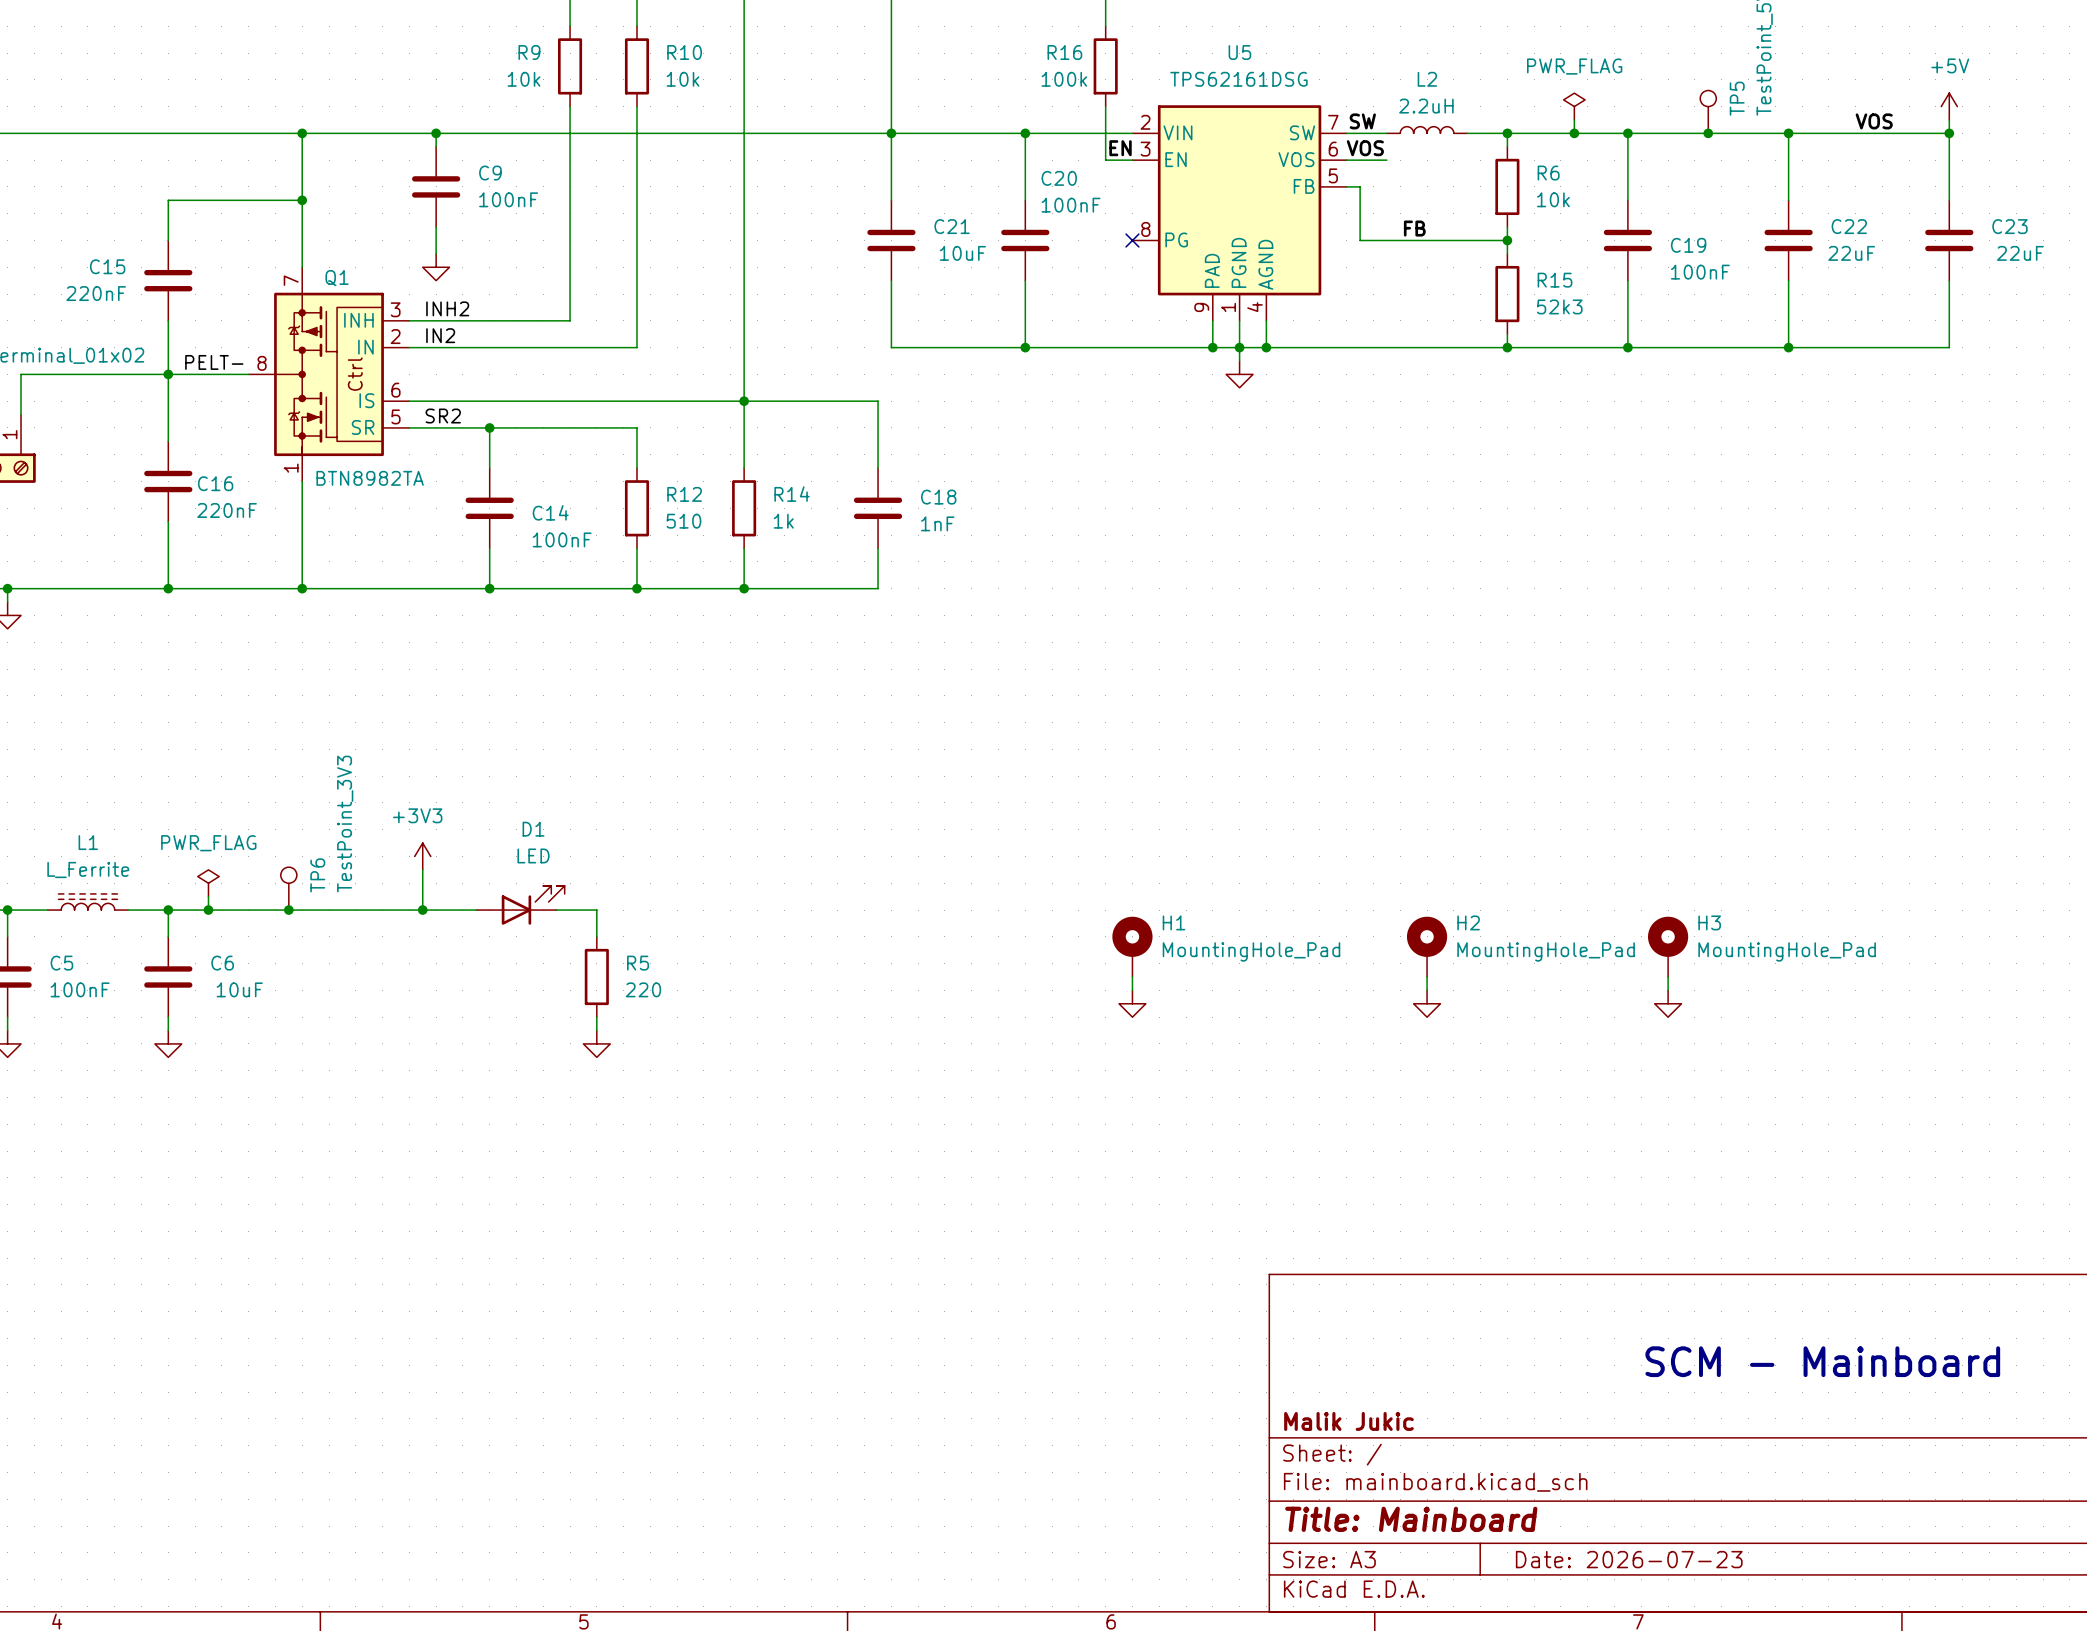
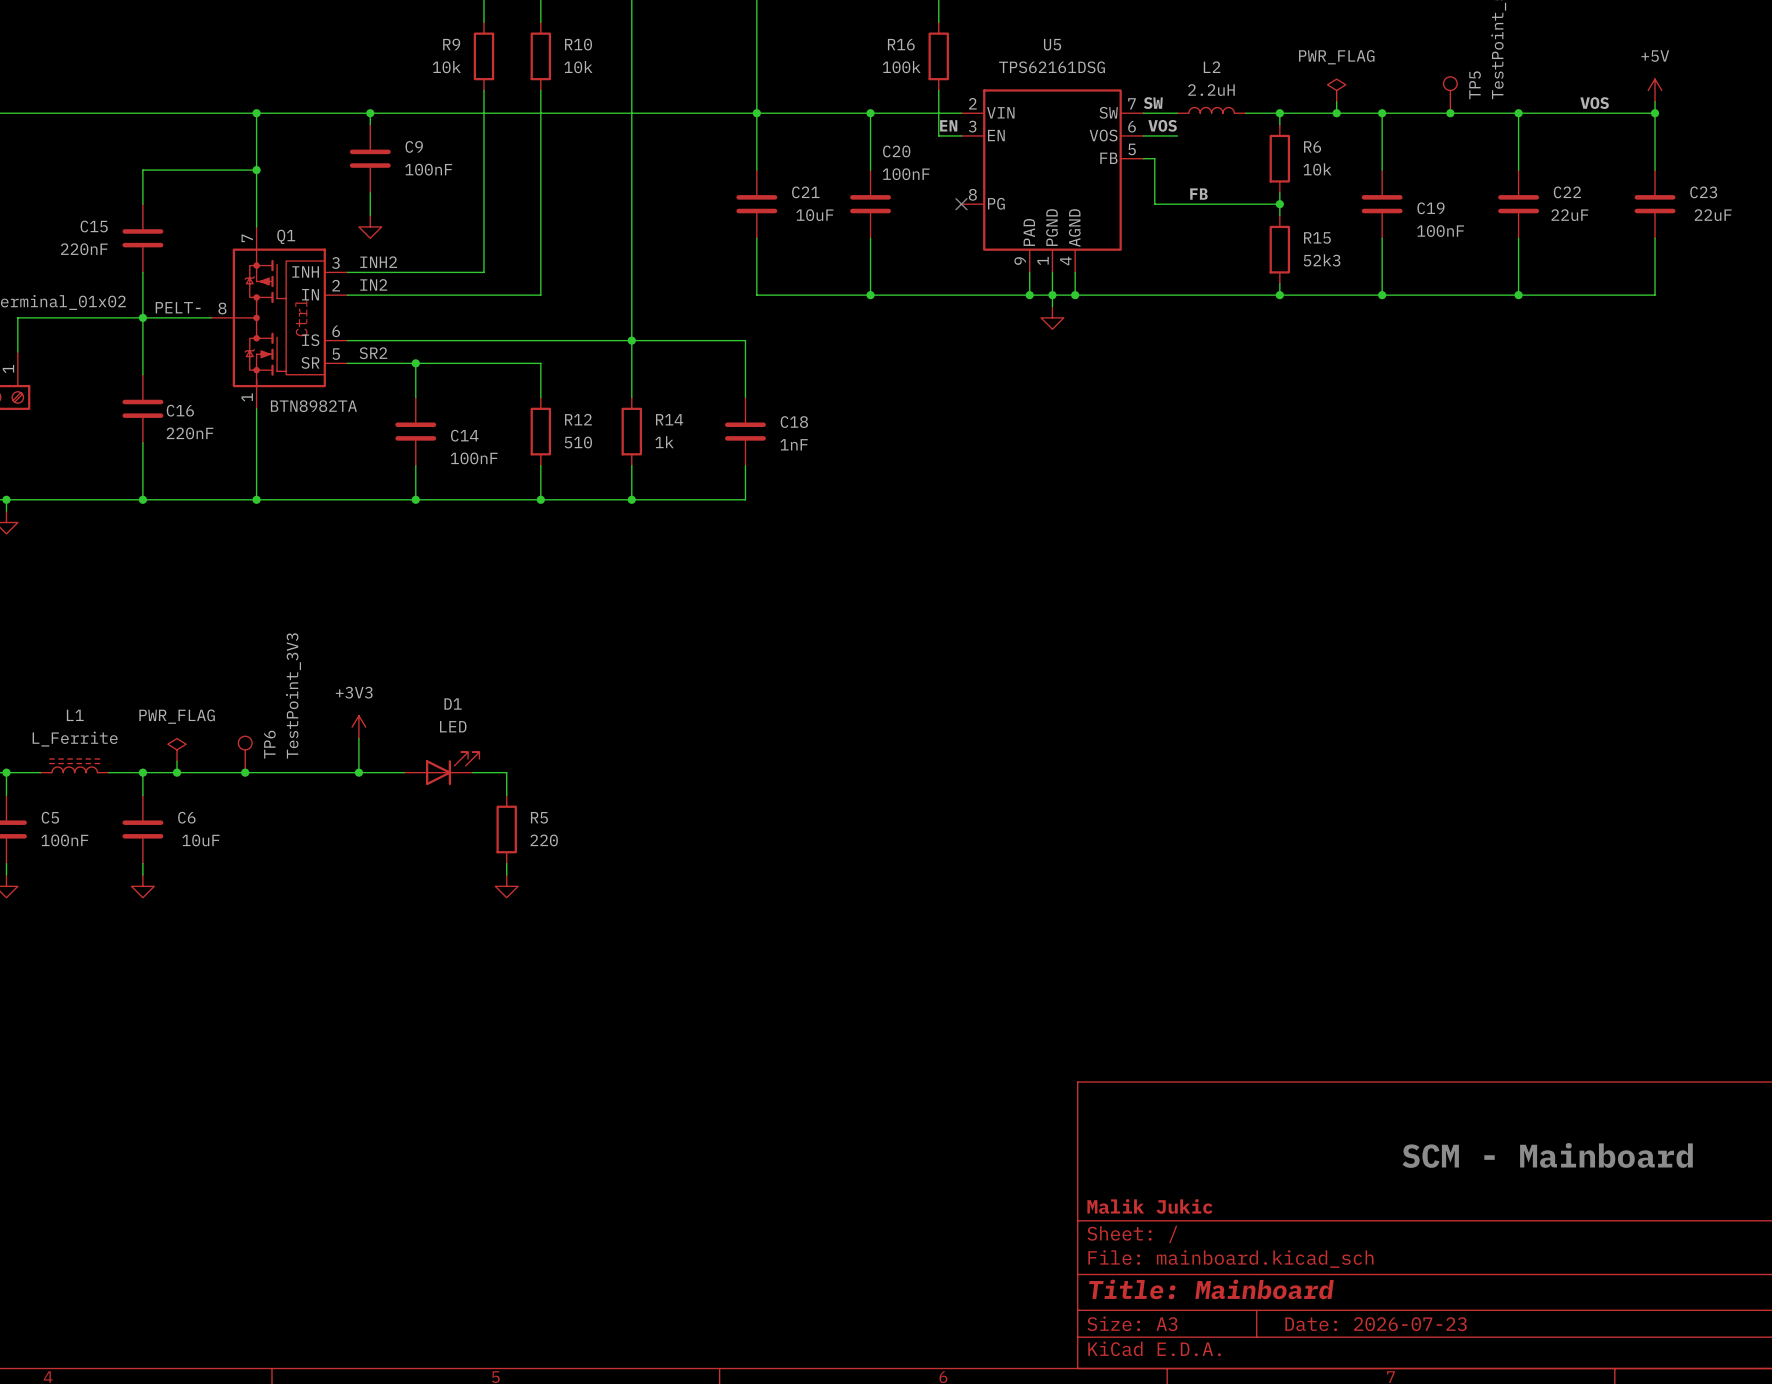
H1: MountingHole_Pad (1132, 946) -> none
H2: MountingHole_Pad (1427, 946) -> none
H3: MountingHole_Pad (1668, 946) -> none
wire: (1132, 976) (1132, 990) -> none
wire: (1427, 976) (1427, 990) -> none
wire: (1668, 976) (1668, 990) -> none
power symbol: (1132, 1003) -> none
power symbol: (1427, 1003) -> none
power symbol: (1668, 1003) -> none

